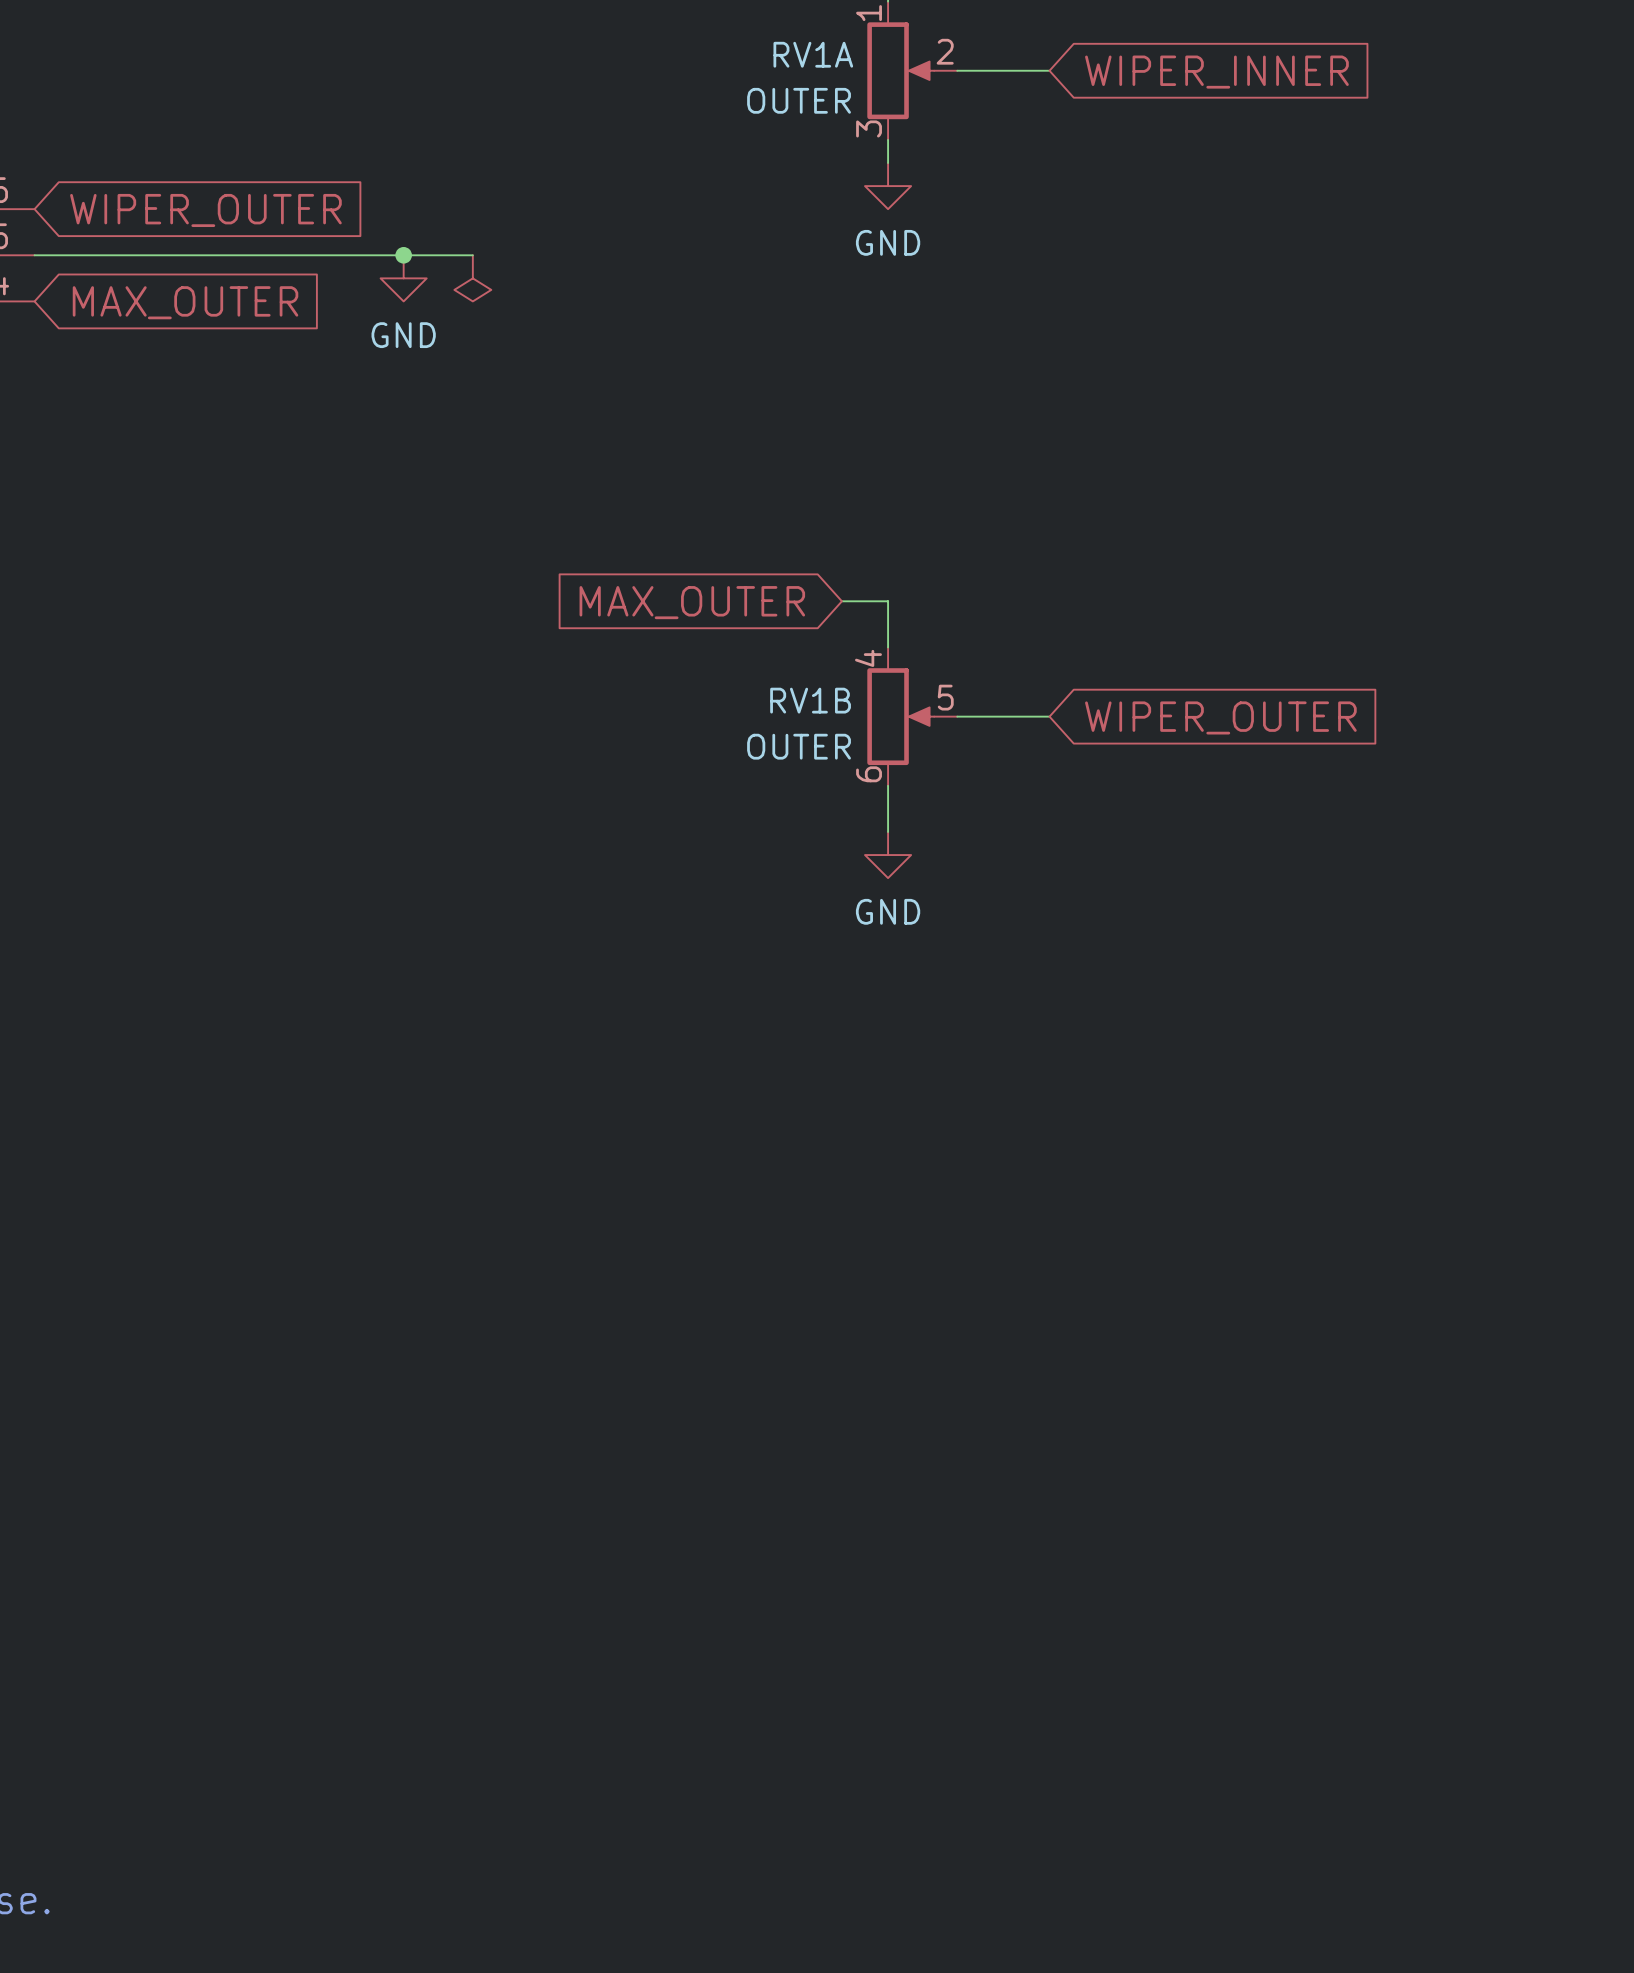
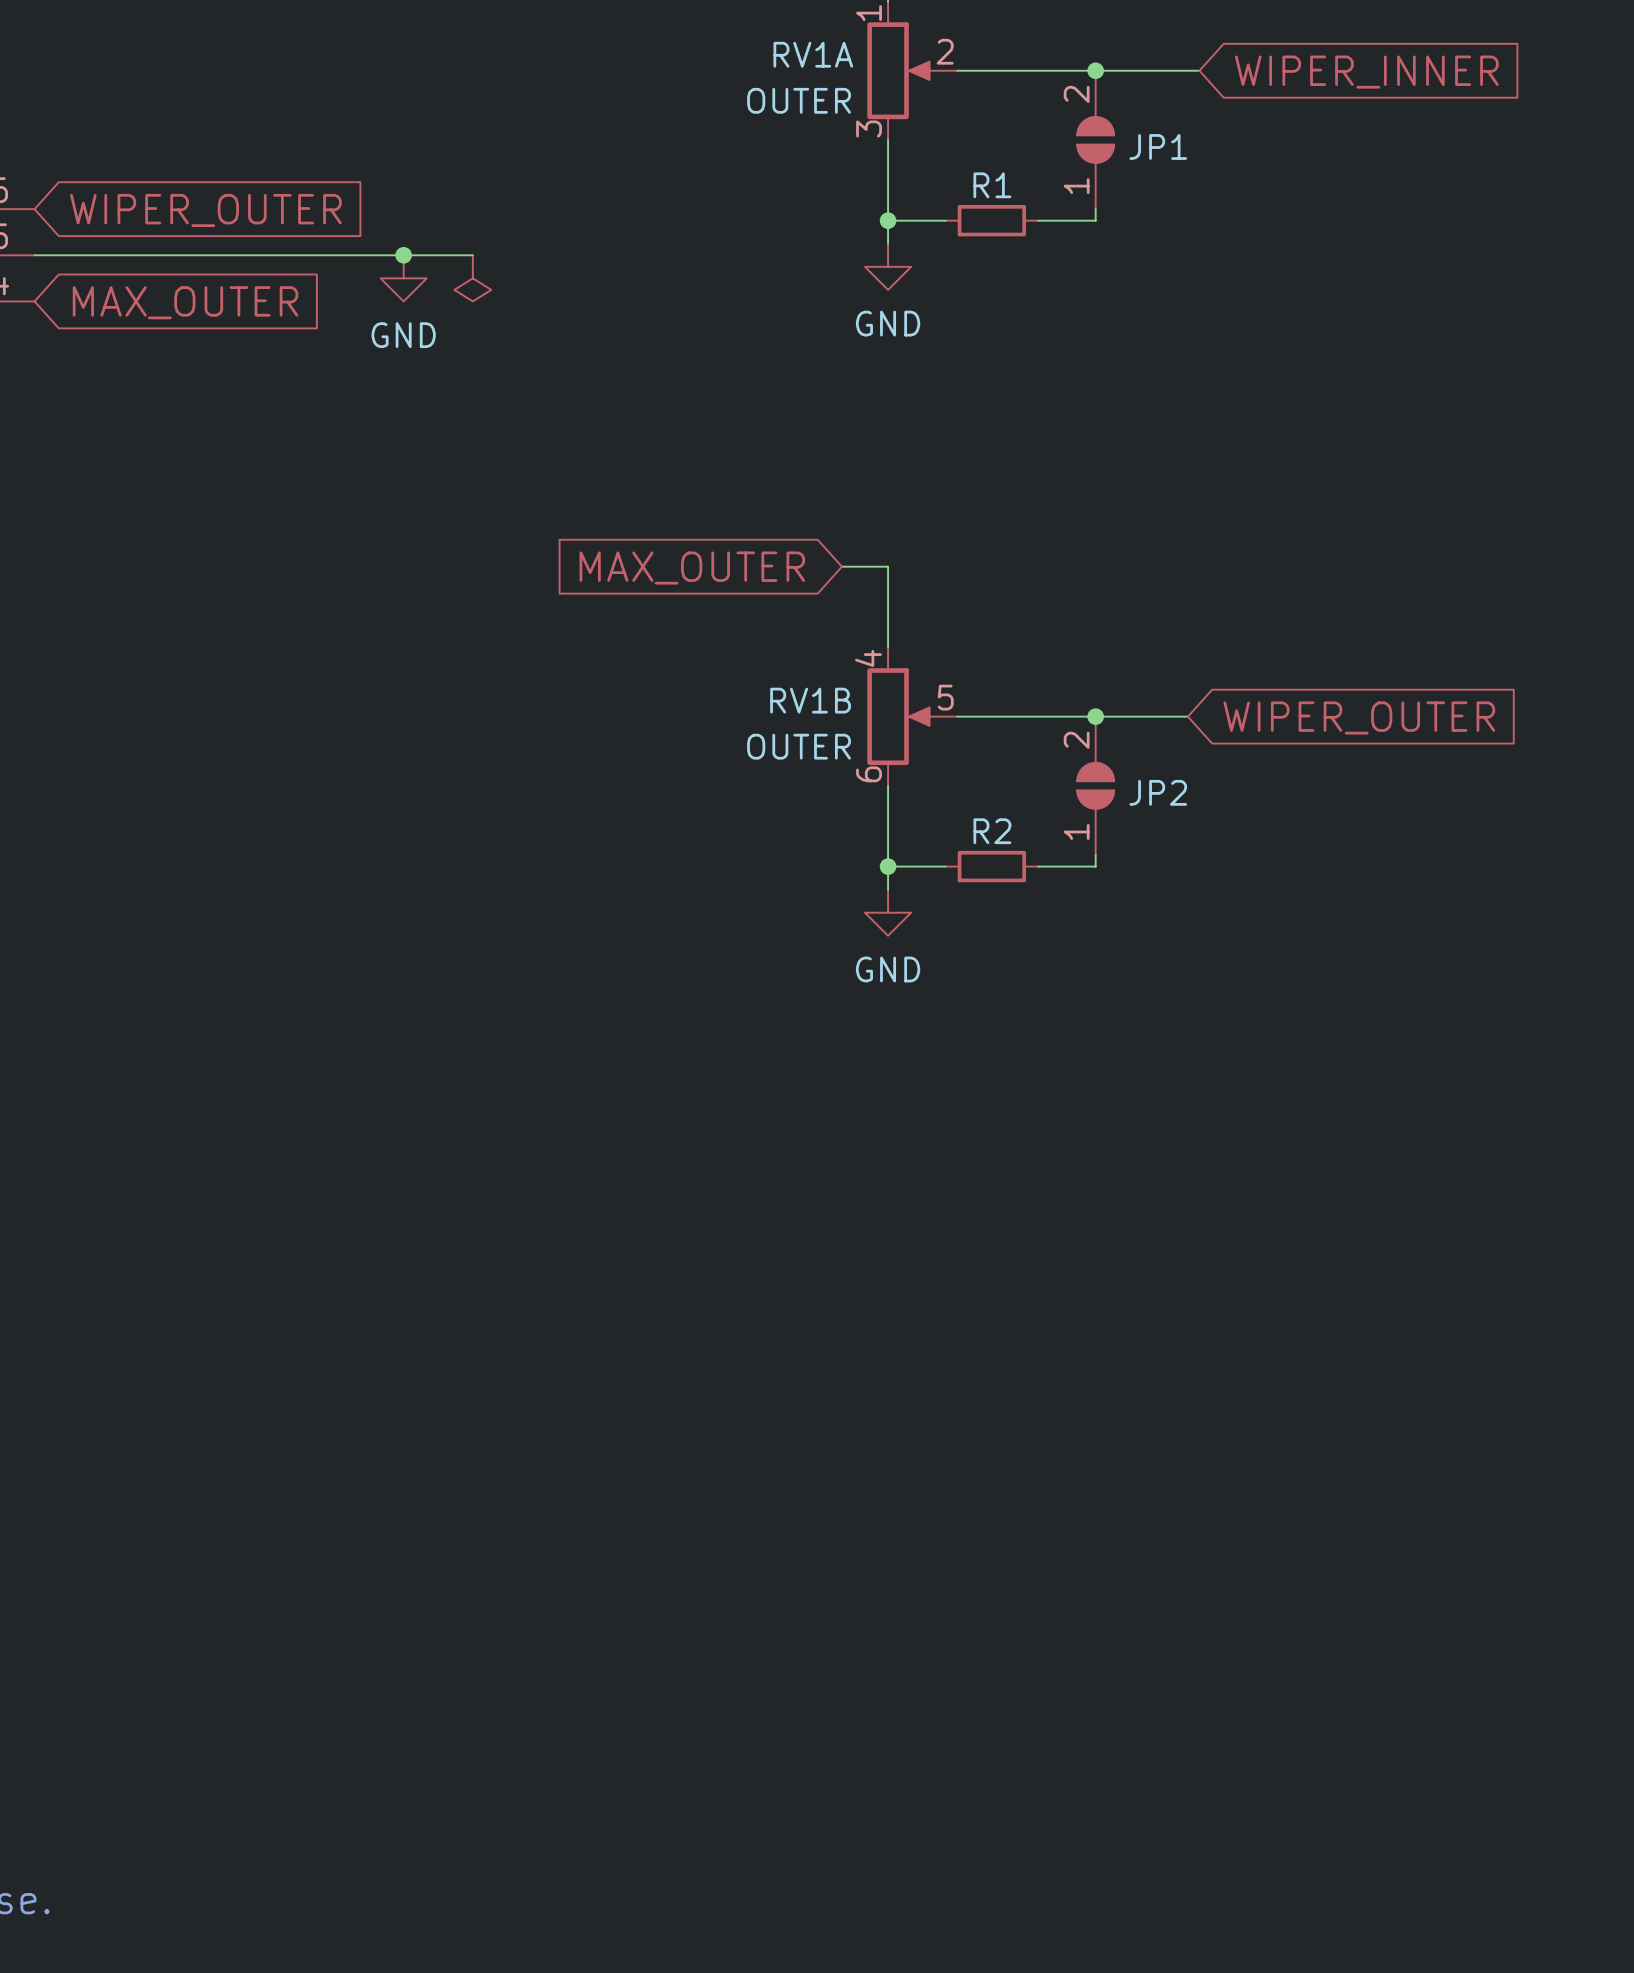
wire: none -> (1049, 70) (1199, 70)
junction: none -> (1095, 70)
global label position: WIPER_INNER (1216, 72) -> WIPER_INNER (1366, 72)
JP1: none -> (1095, 139)
wire: none -> (888, 163) (888, 243)
power symbol position: GND (888, 186) -> GND (888, 266)
wire: none -> (1095, 209) (1095, 220) (1038, 220)
wire: none -> (888, 220) (945, 220)
junction: none -> (888, 220)
R1: none -> (991, 220)
wire: (841, 601) (888, 601) -> (841, 566) (888, 566) (888, 601)
global label position: MAX_OUTER (692, 602) -> MAX_OUTER (692, 568)
wire: none -> (1049, 716) (1187, 716)
junction: none -> (1095, 716)
global label position: WIPER_OUTER (1220, 717) -> WIPER_OUTER (1359, 717)
JP2: none -> (1095, 785)
wire: none -> (888, 831) (888, 889)
power symbol position: GND (888, 855) -> GND (888, 912)
wire: none -> (1095, 855) (1095, 866) (1038, 866)
wire: none -> (888, 866) (945, 866)
junction: none -> (888, 866)
R2: none -> (991, 866)

